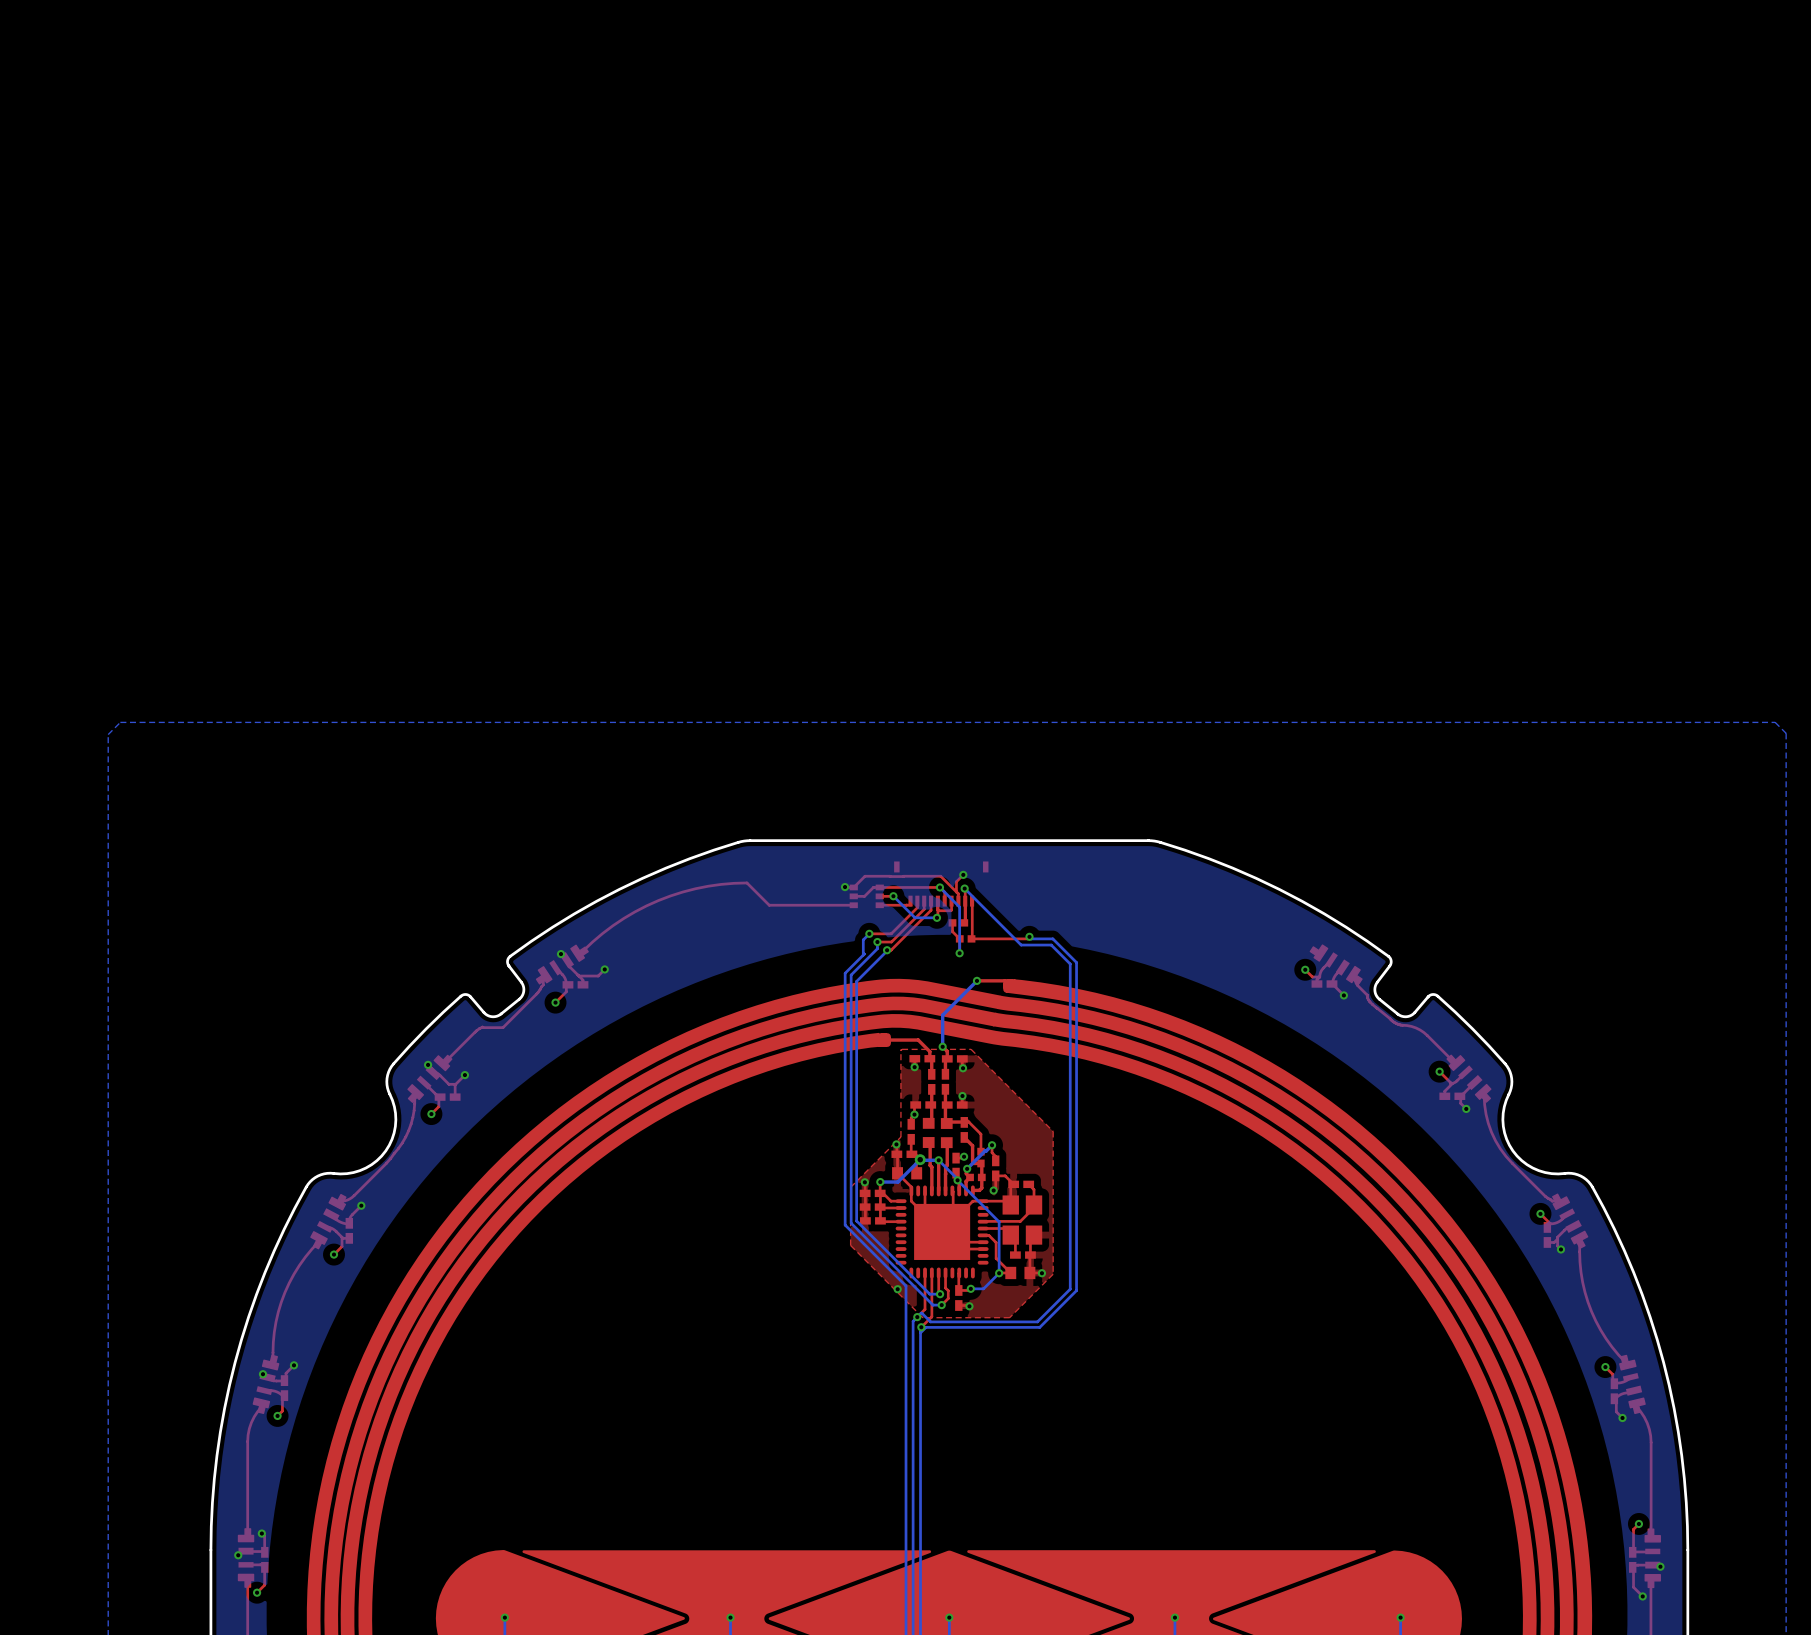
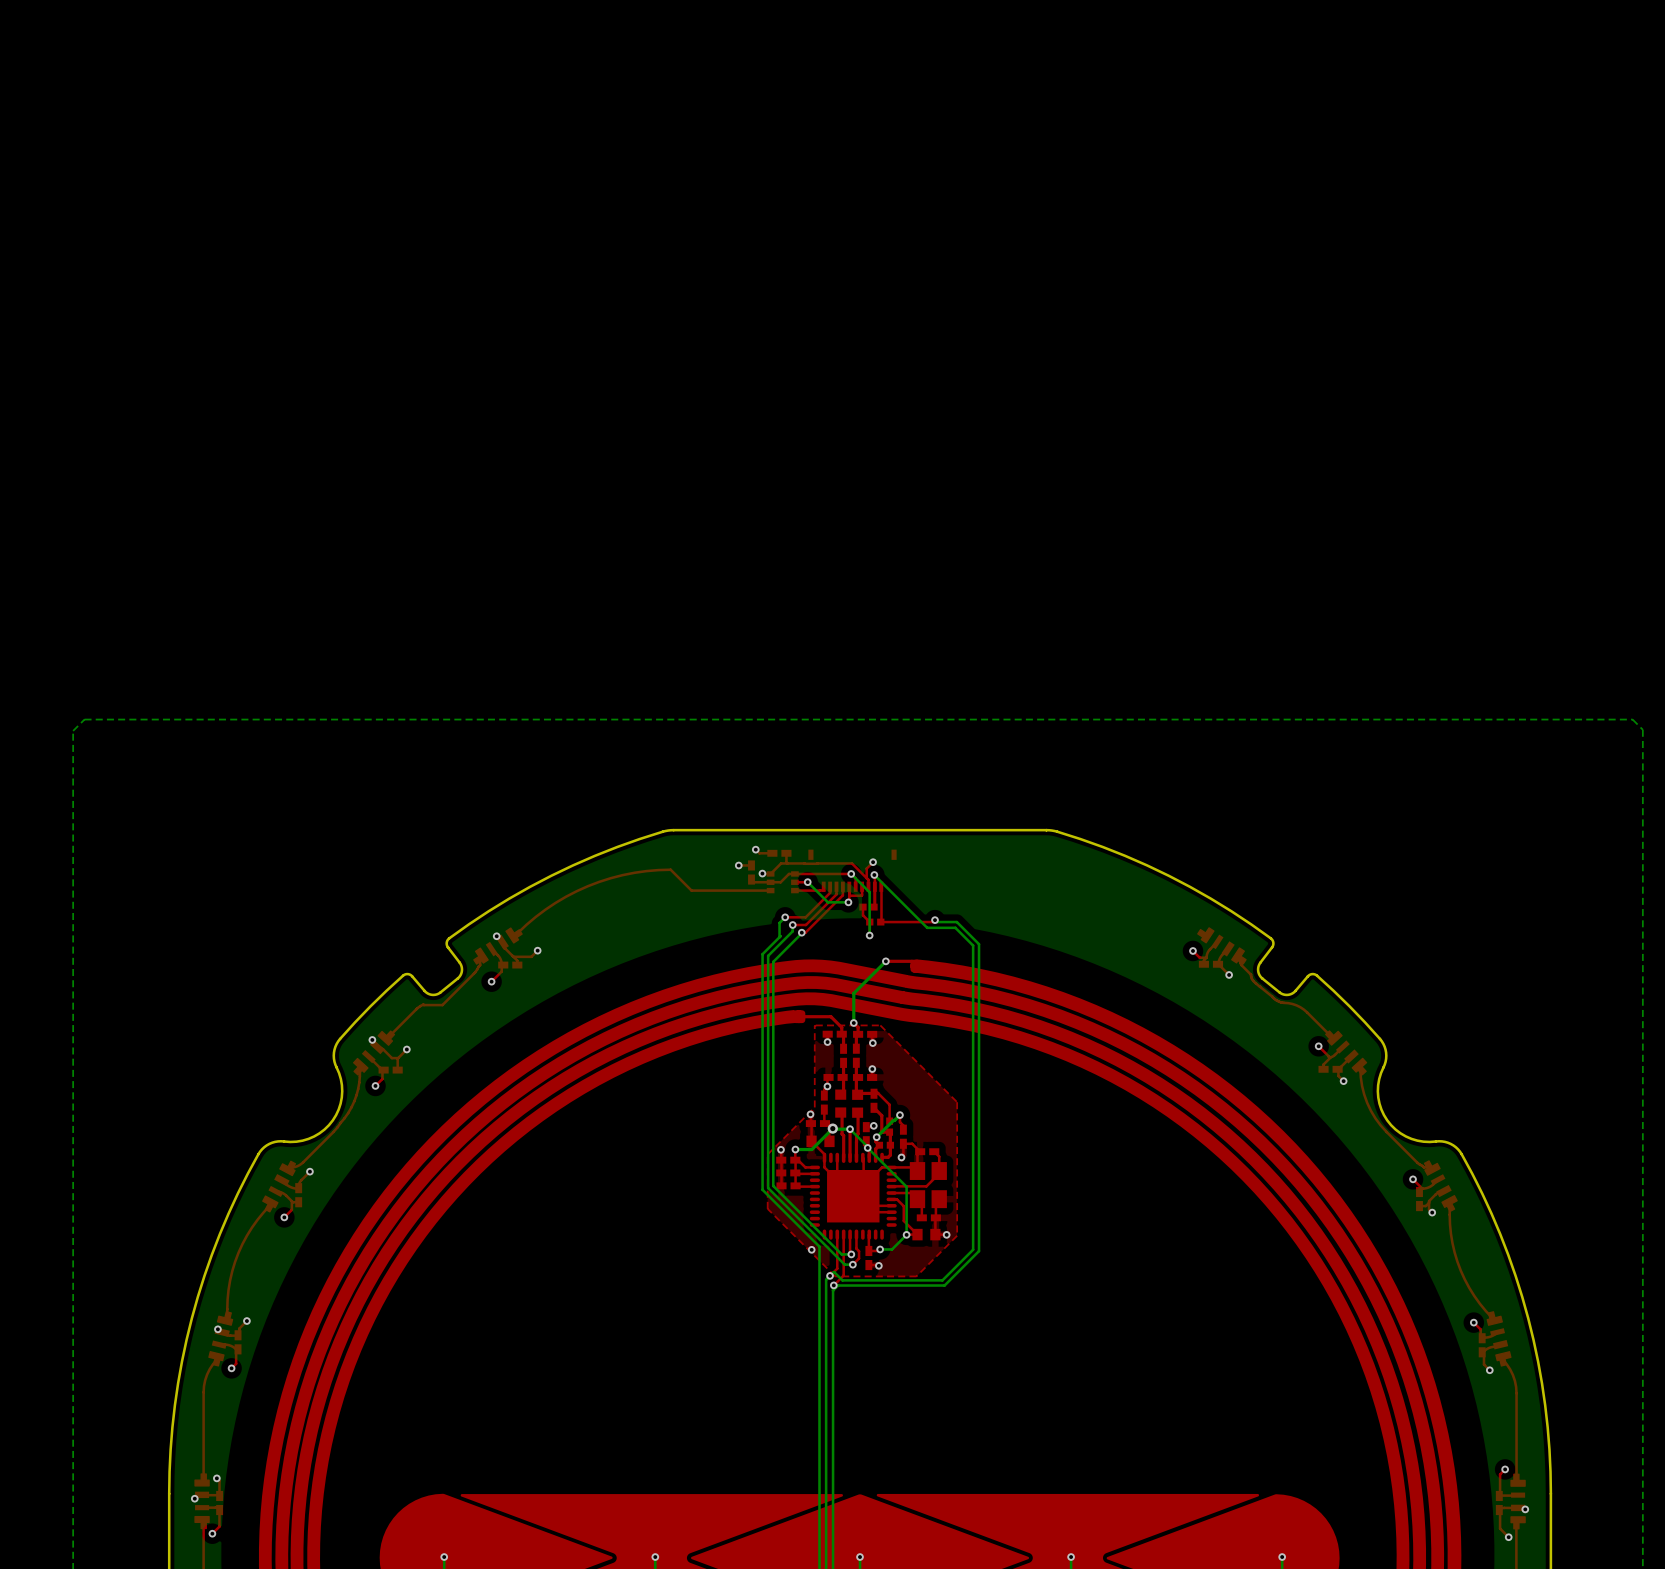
top track: none -> (755, 849) (759, 853) (772, 853)
via: none -> (755, 849)
part: none -> (779, 853)
top track: none -> (786, 853) (787, 863)
via: none -> (738, 865)
top track: none -> (751, 865) (738, 865)
part: none -> (751, 872)
top track: none -> (751, 879) (754, 882) (770, 882)

